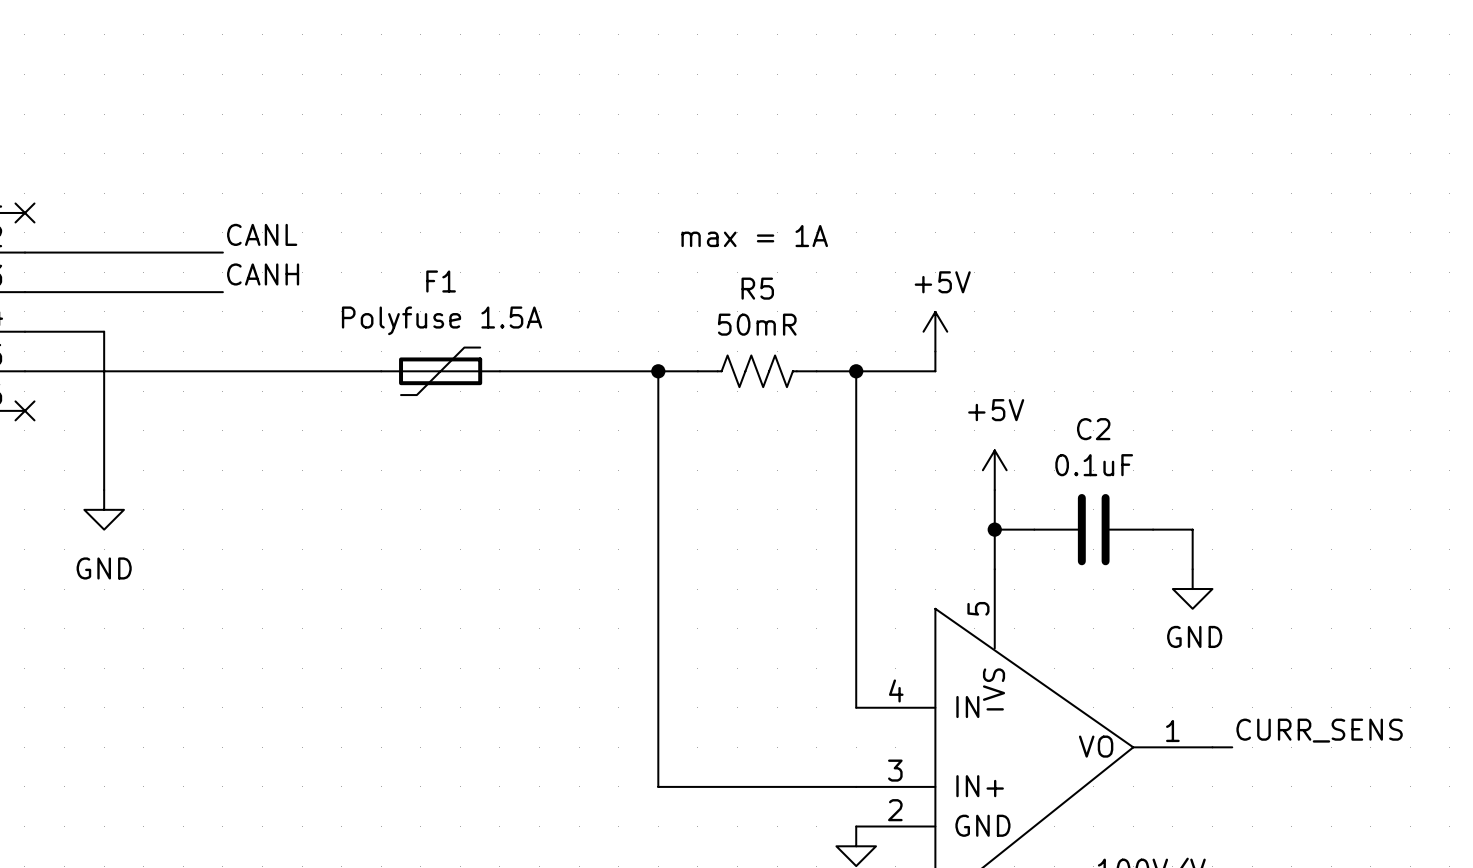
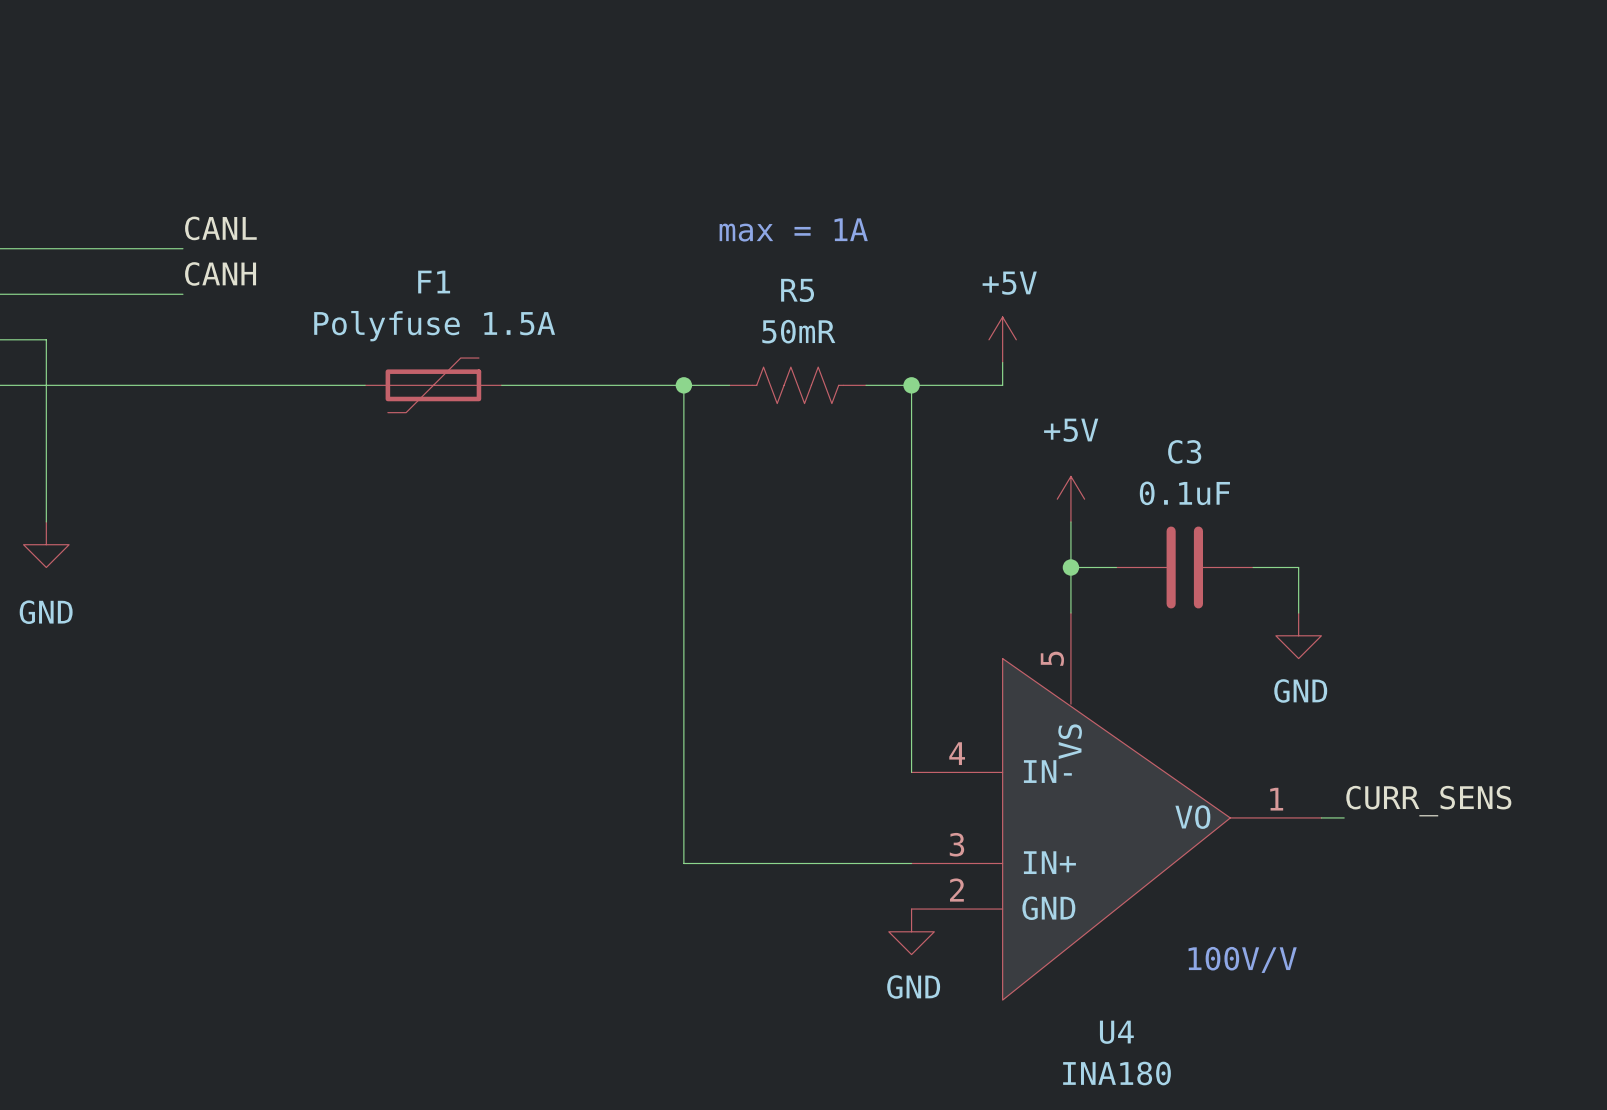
C2 name: C2 (1093, 429) -> C3 (1184, 451)

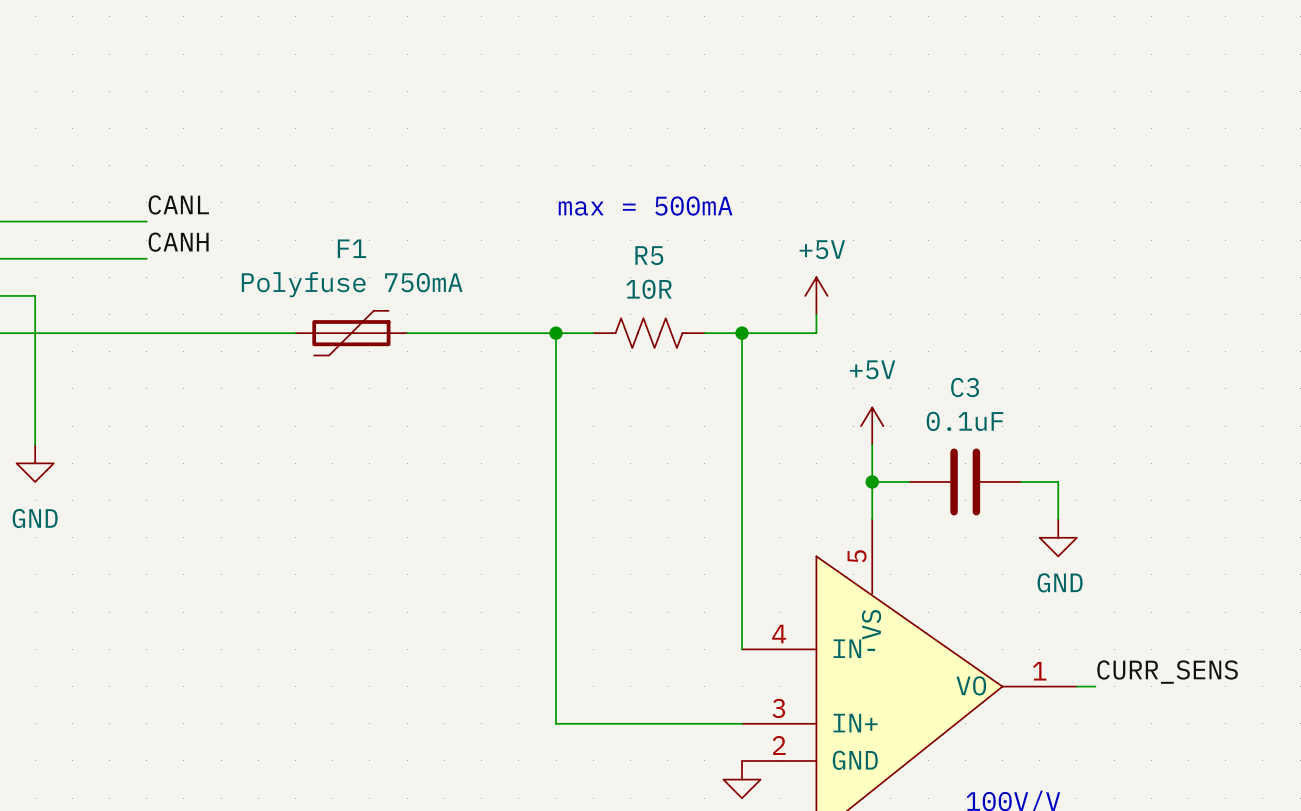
text: max = 1A (793, 229) -> max = 500mA (645, 206)
F1 value: Polyfuse 1.5A (434, 326) -> Polyfuse 750mA (352, 284)
R5 value: 50mR (798, 331) -> 10R (649, 289)

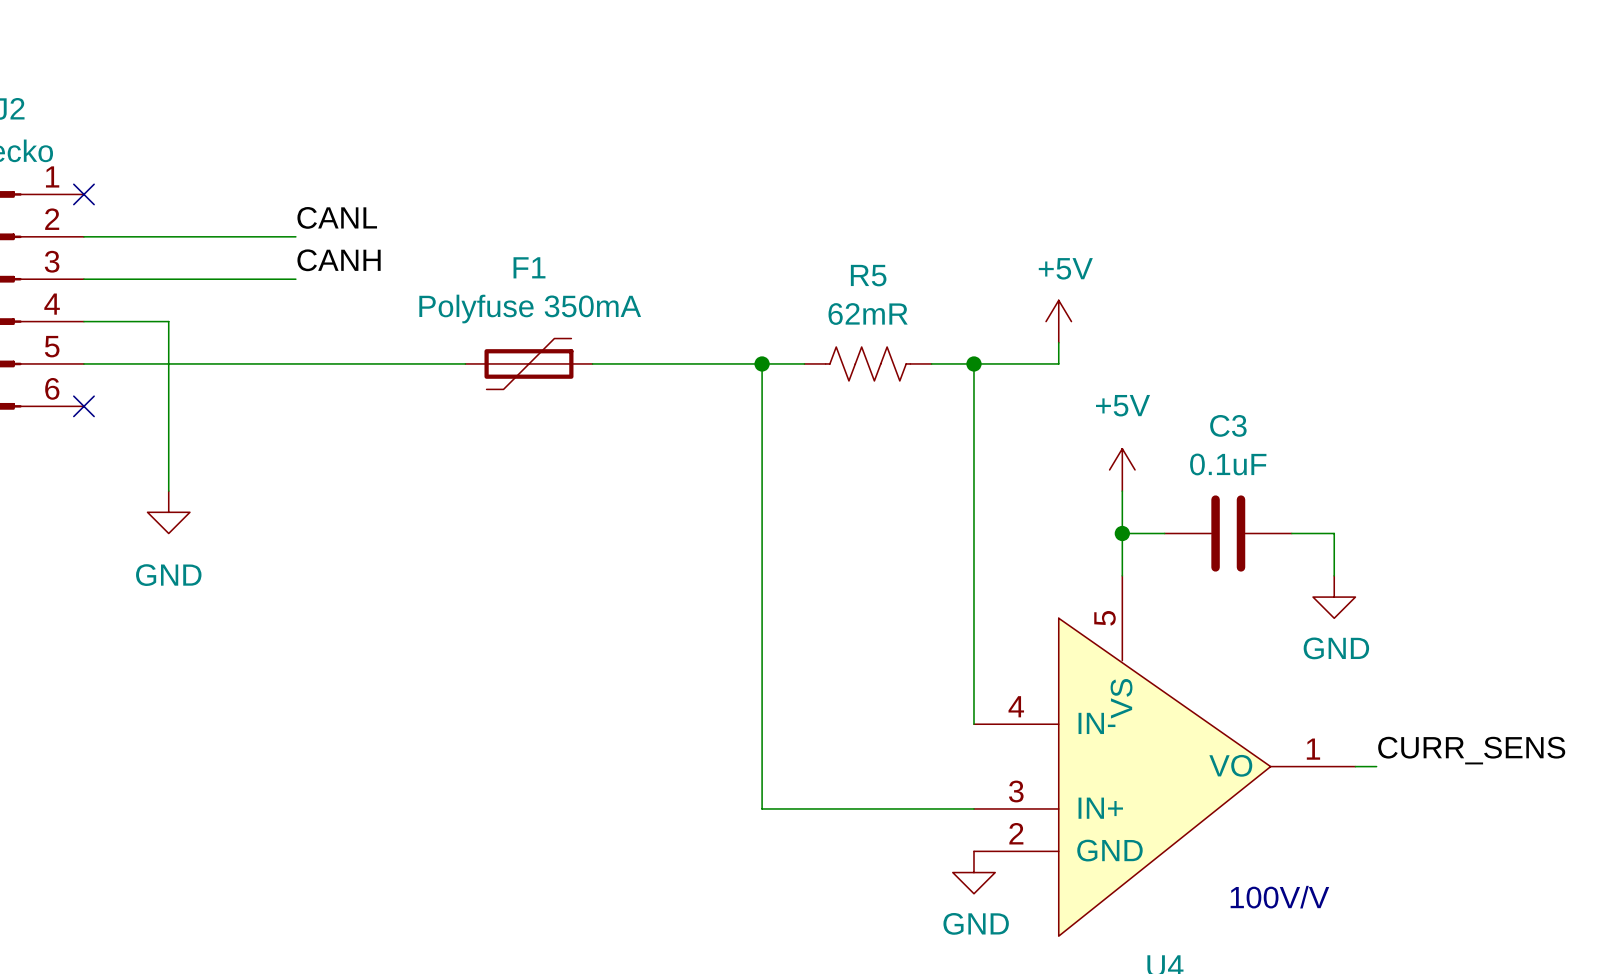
text: max = 500mA (645, 206) -> none
F1 value: Polyfuse 750mA (352, 284) -> Polyfuse 350mA (530, 309)
R5 value: 10R (649, 289) -> 62mR (868, 314)

